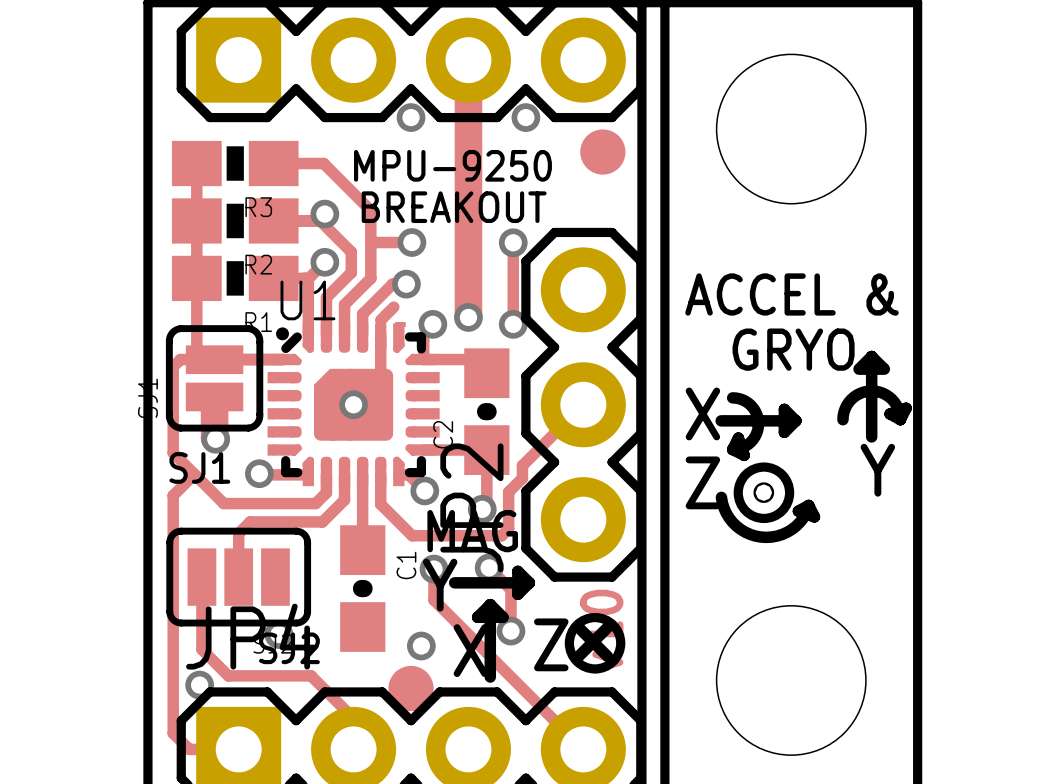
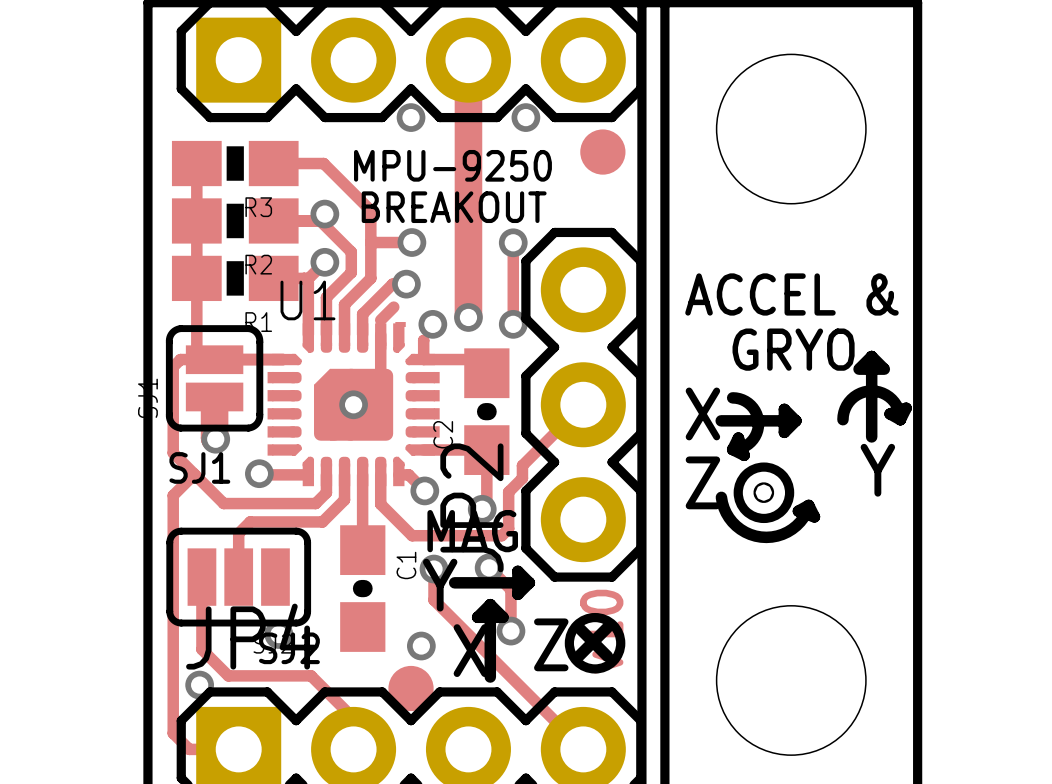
U1 footprint: [272, 323, 435, 487] -> [272, 323, 435, 487]

